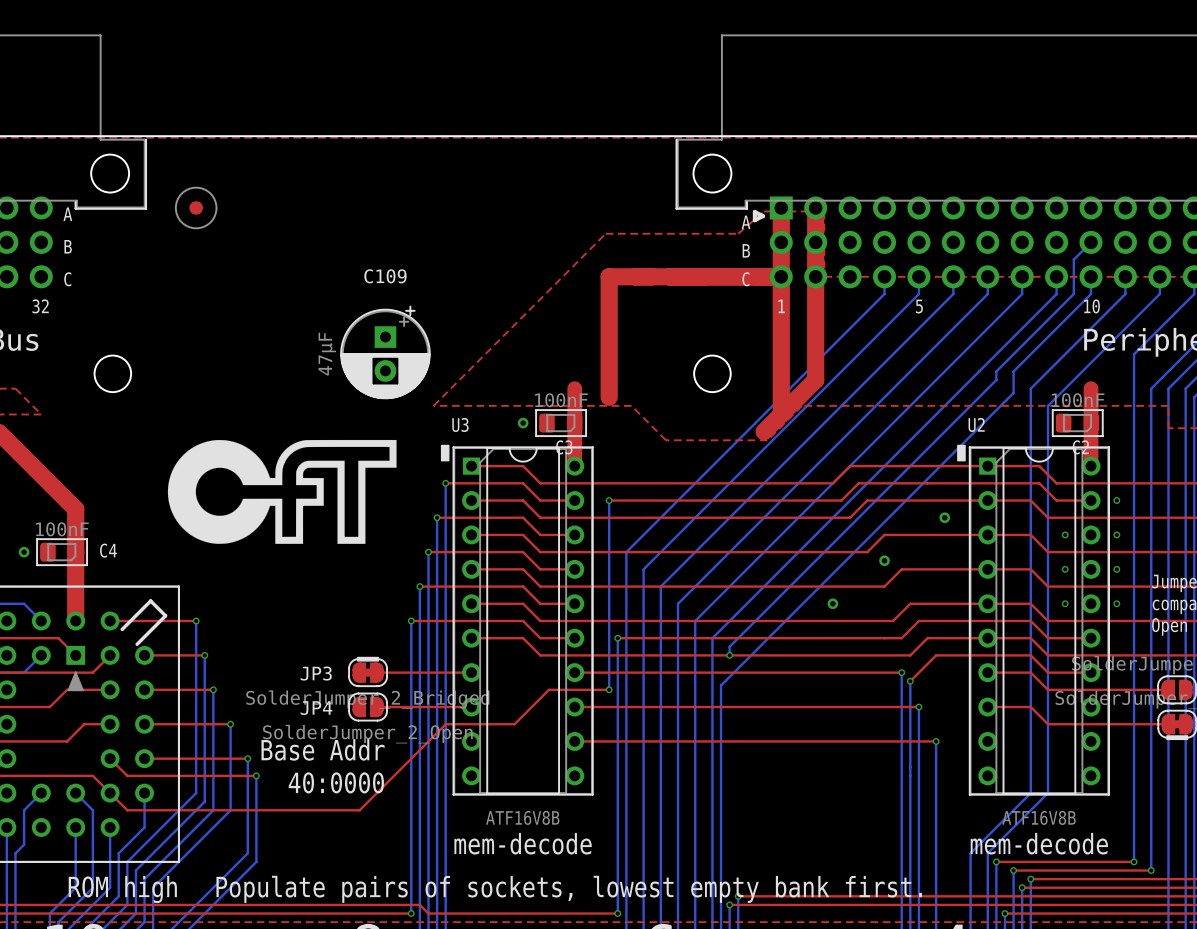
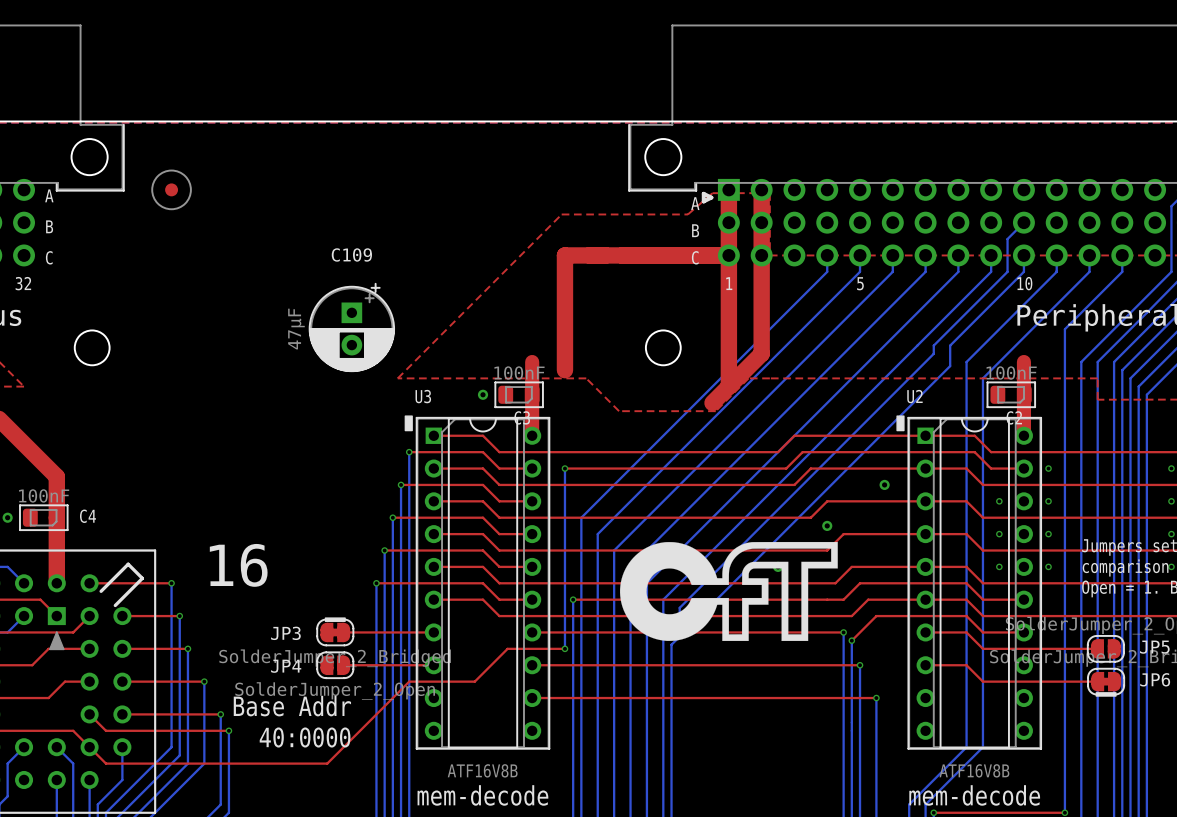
drawing: [167, 439, 397, 544] -> none
drawing: none -> [619, 541, 838, 641]
text: none -> 16 (238, 565)

